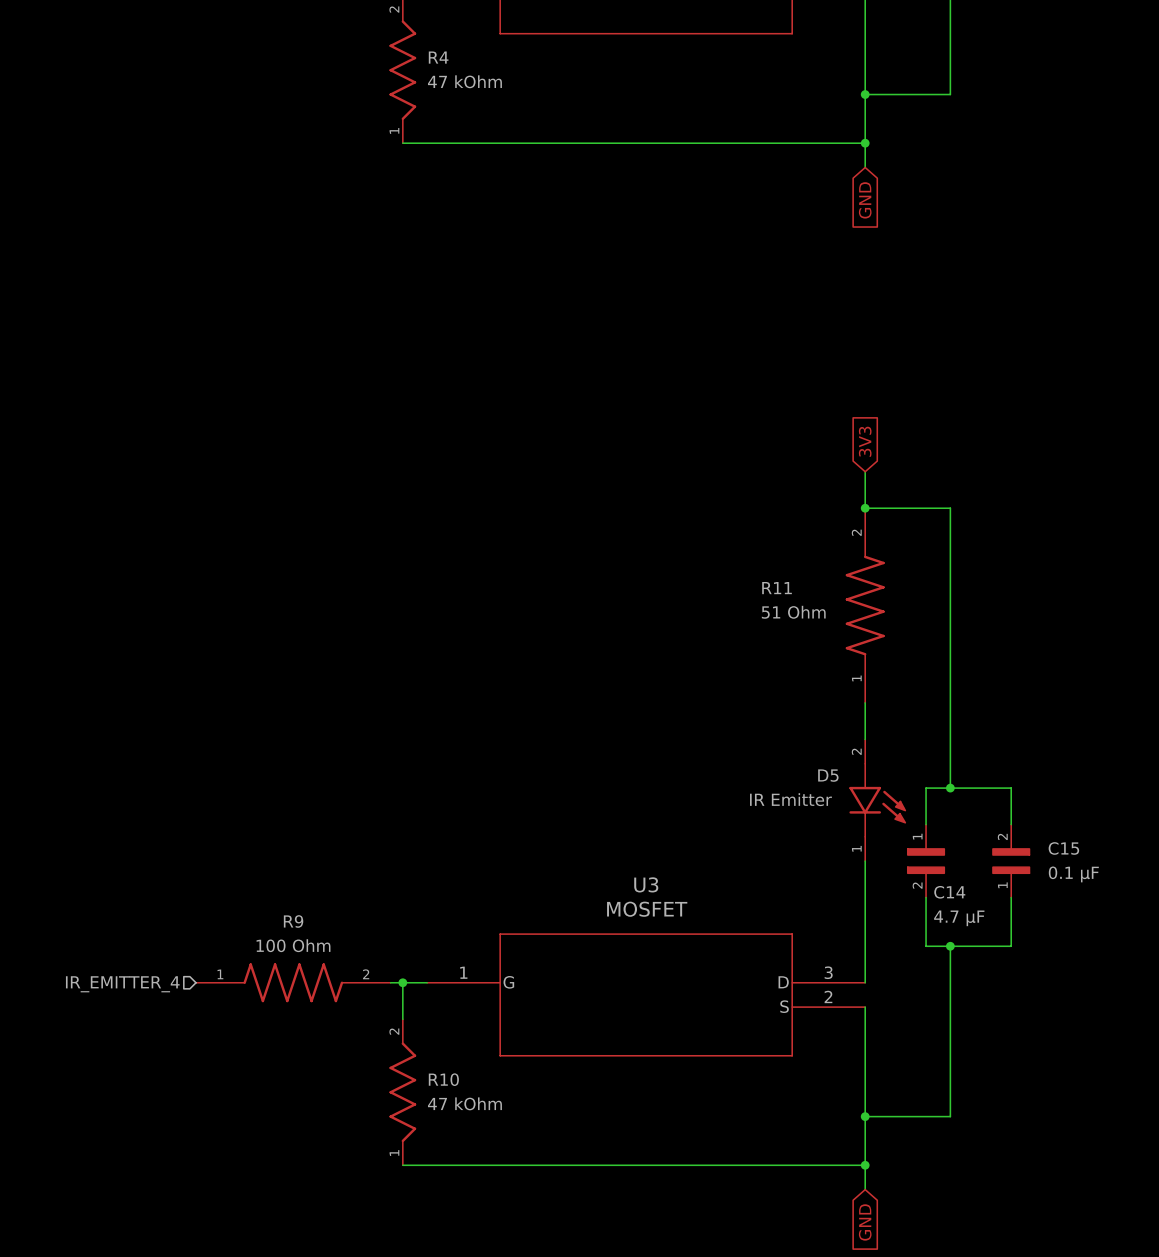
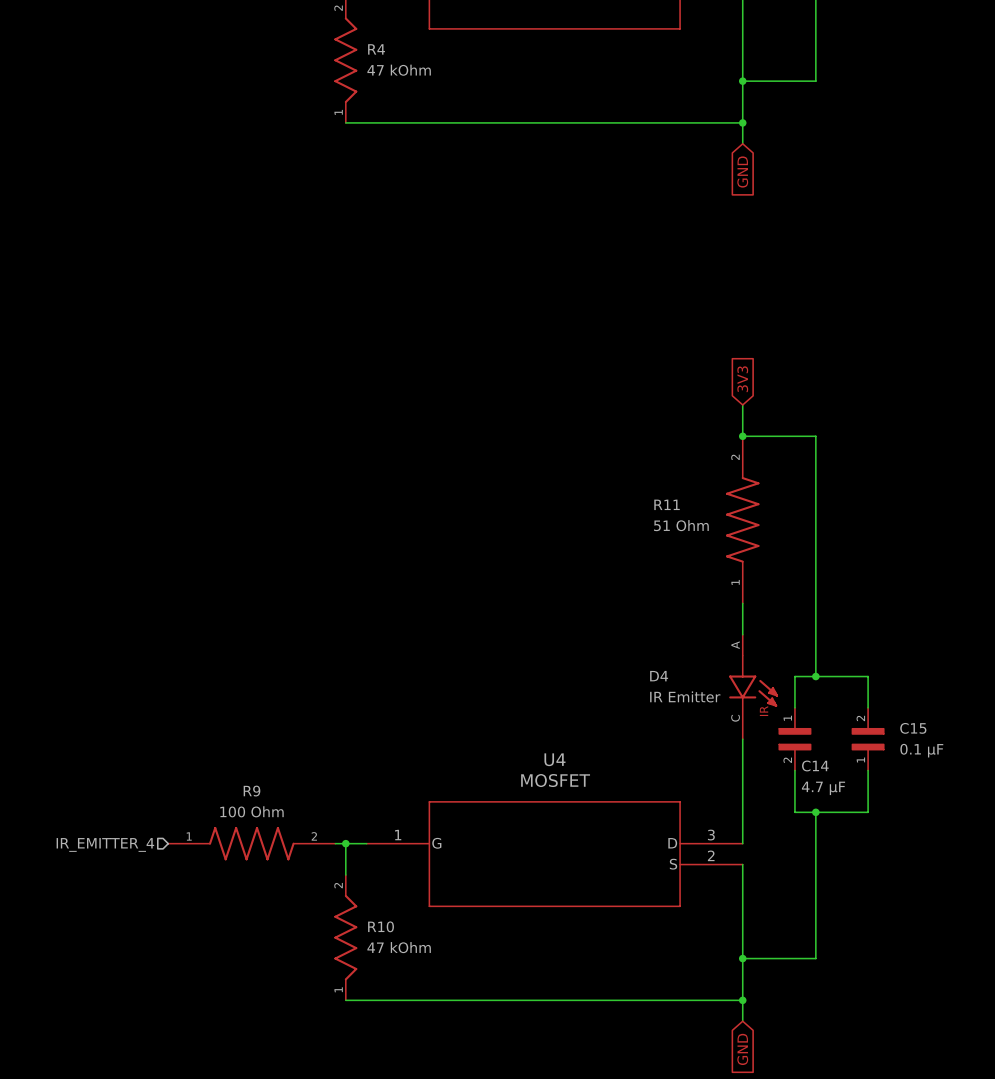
D5: IR Emitter (877, 800) -> none
D4: none -> IR Emitter (753, 686)
U3 name: U3 (646, 884) -> U4 (554, 759)

